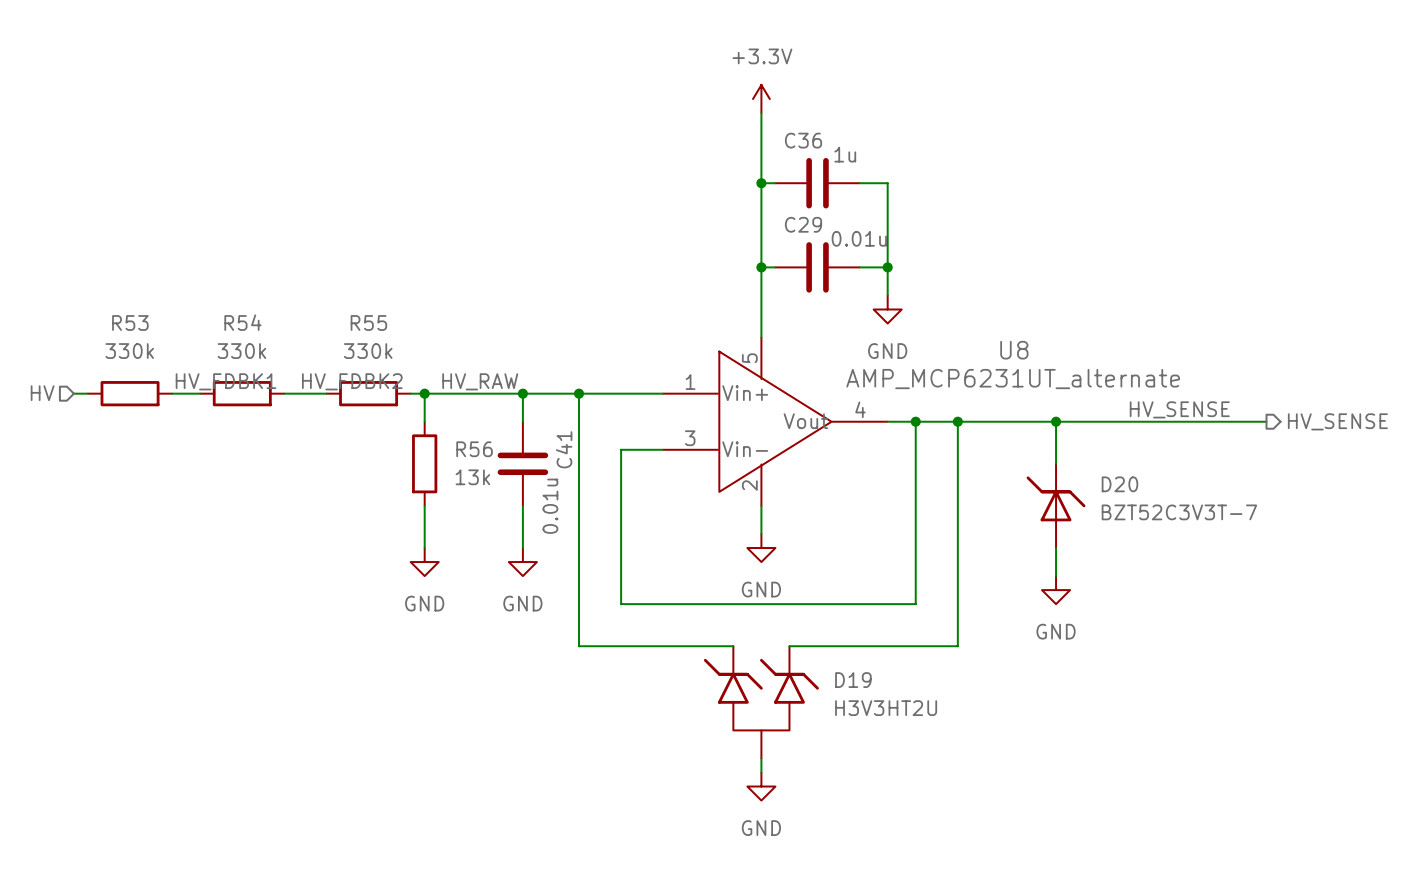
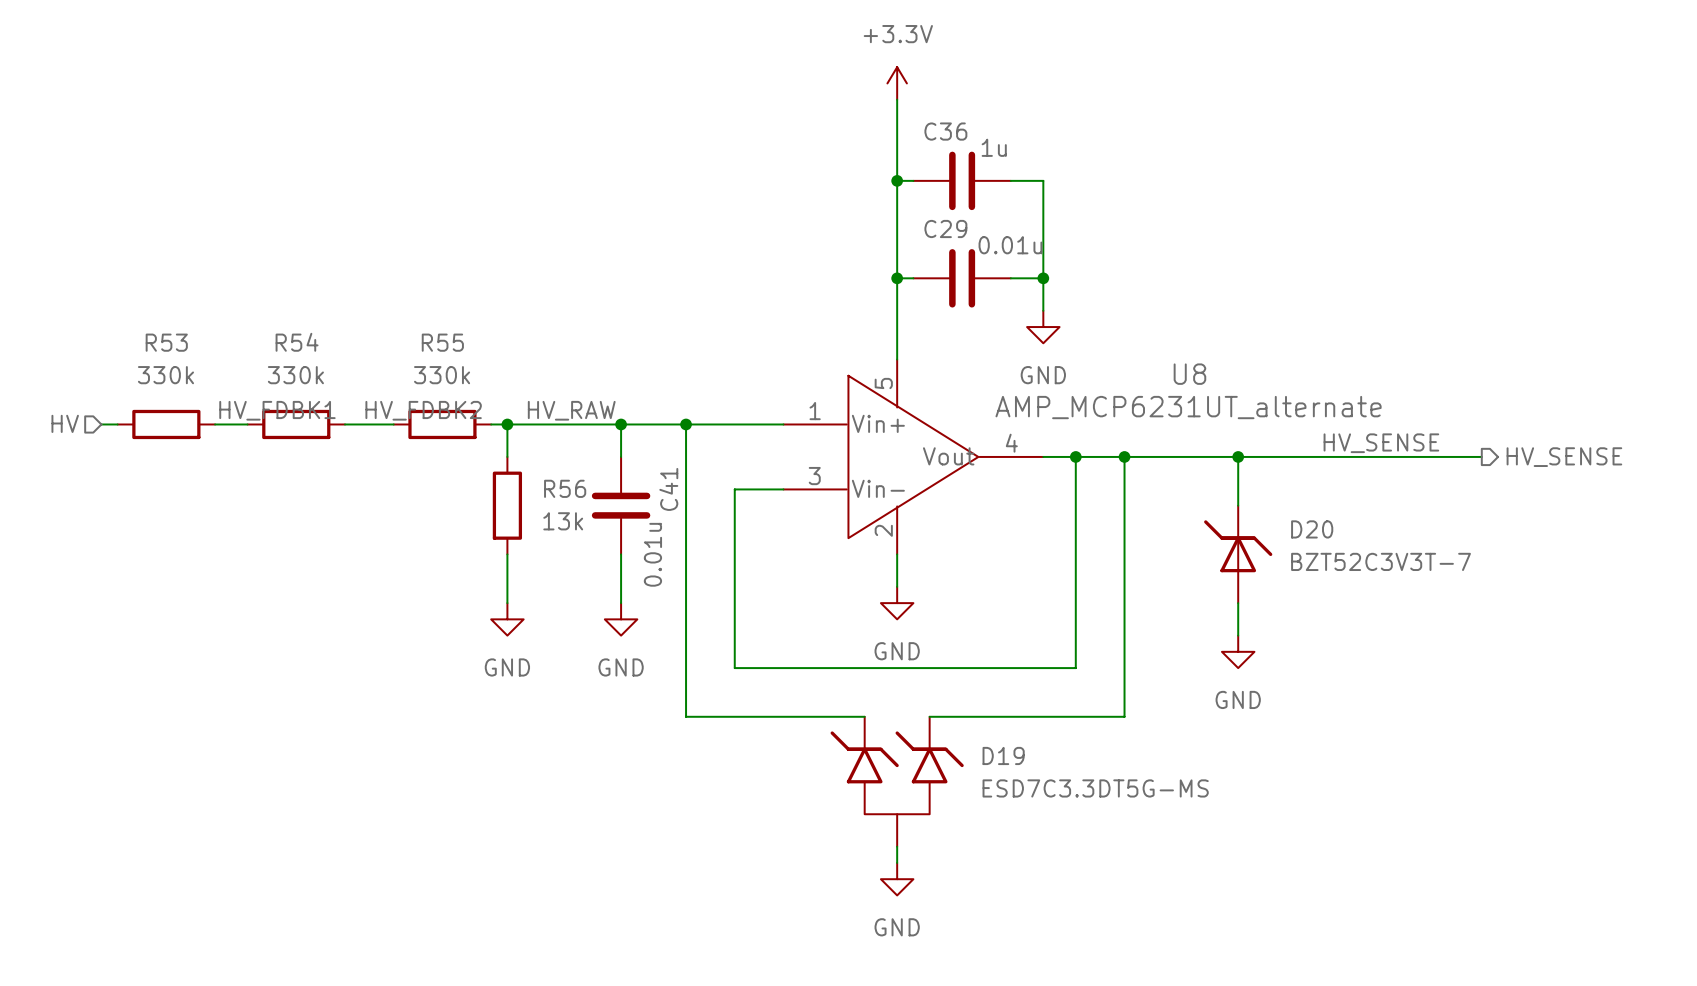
D19 value: H3V3HT2U (886, 708) -> ESD7C3.3DT5G-MS (1095, 788)

